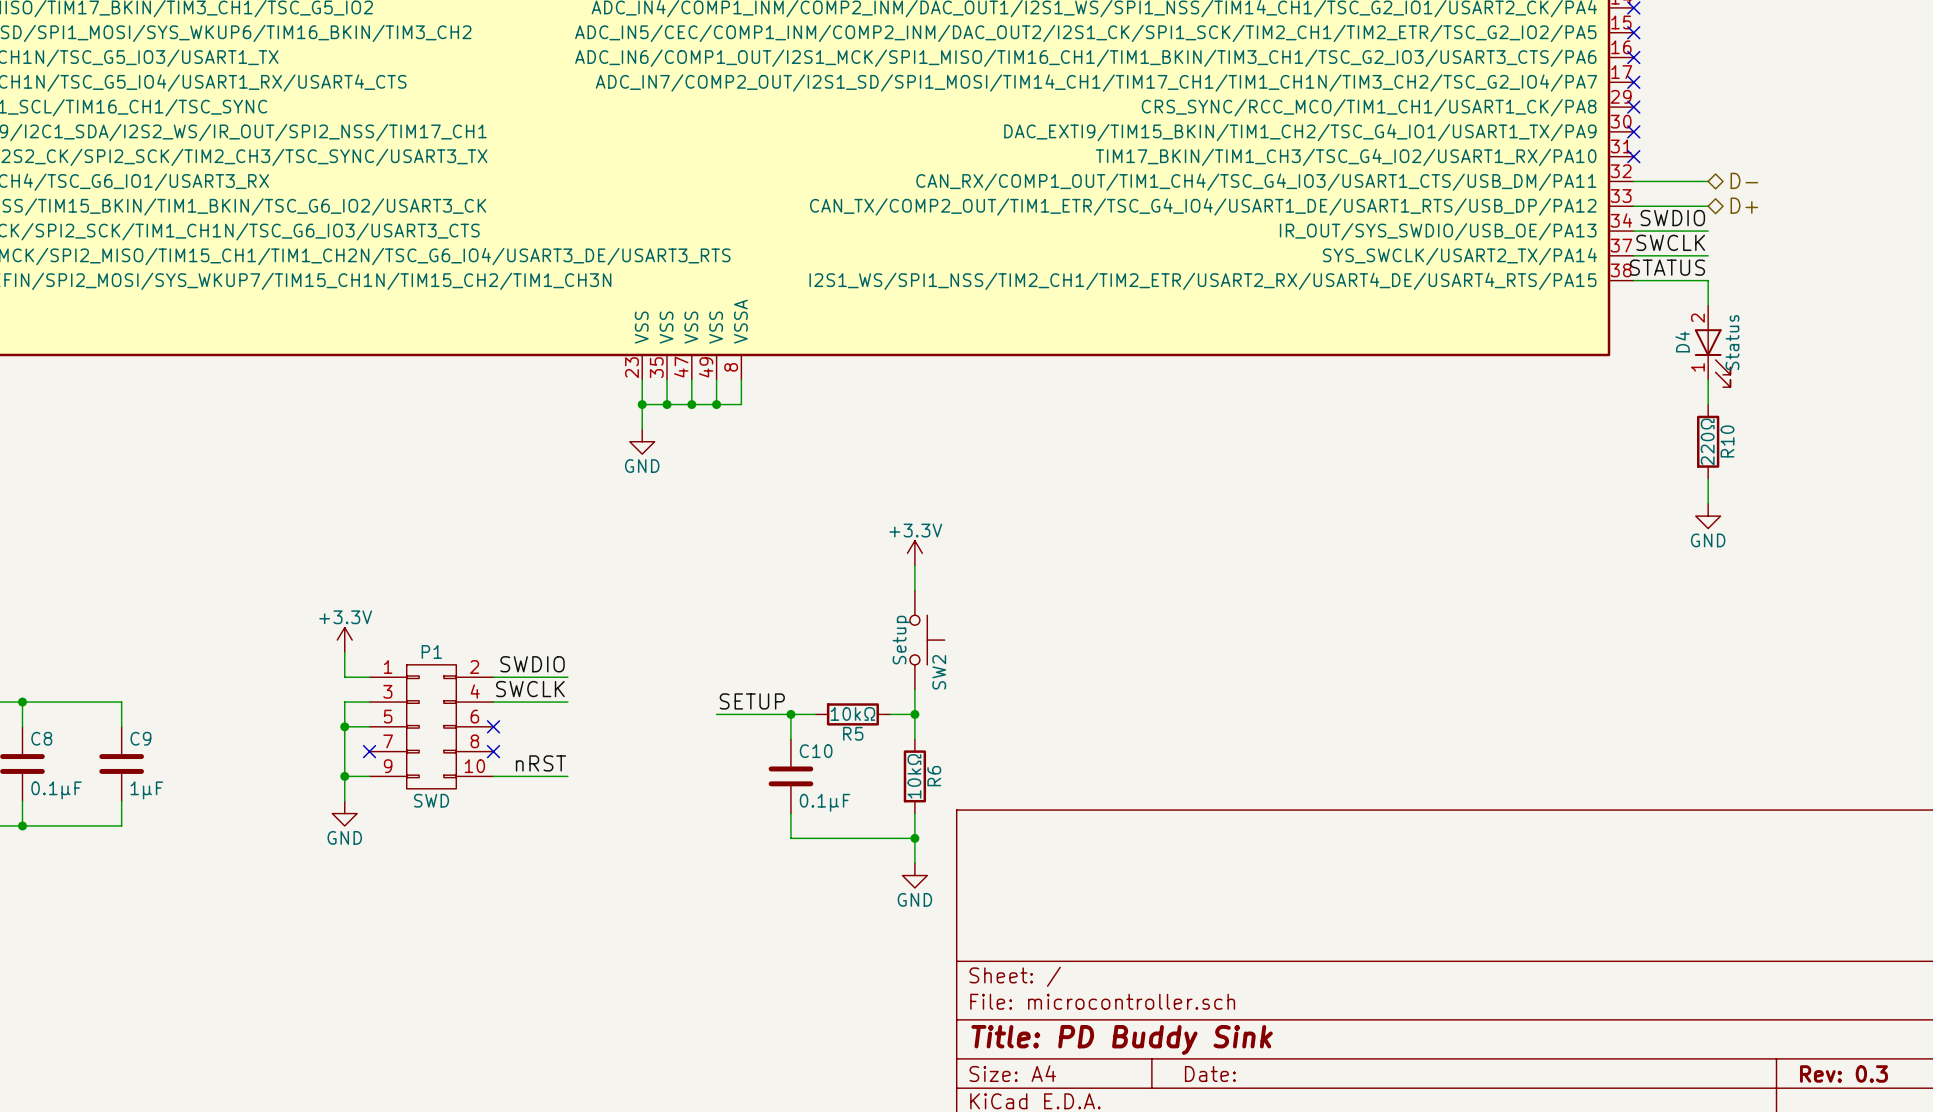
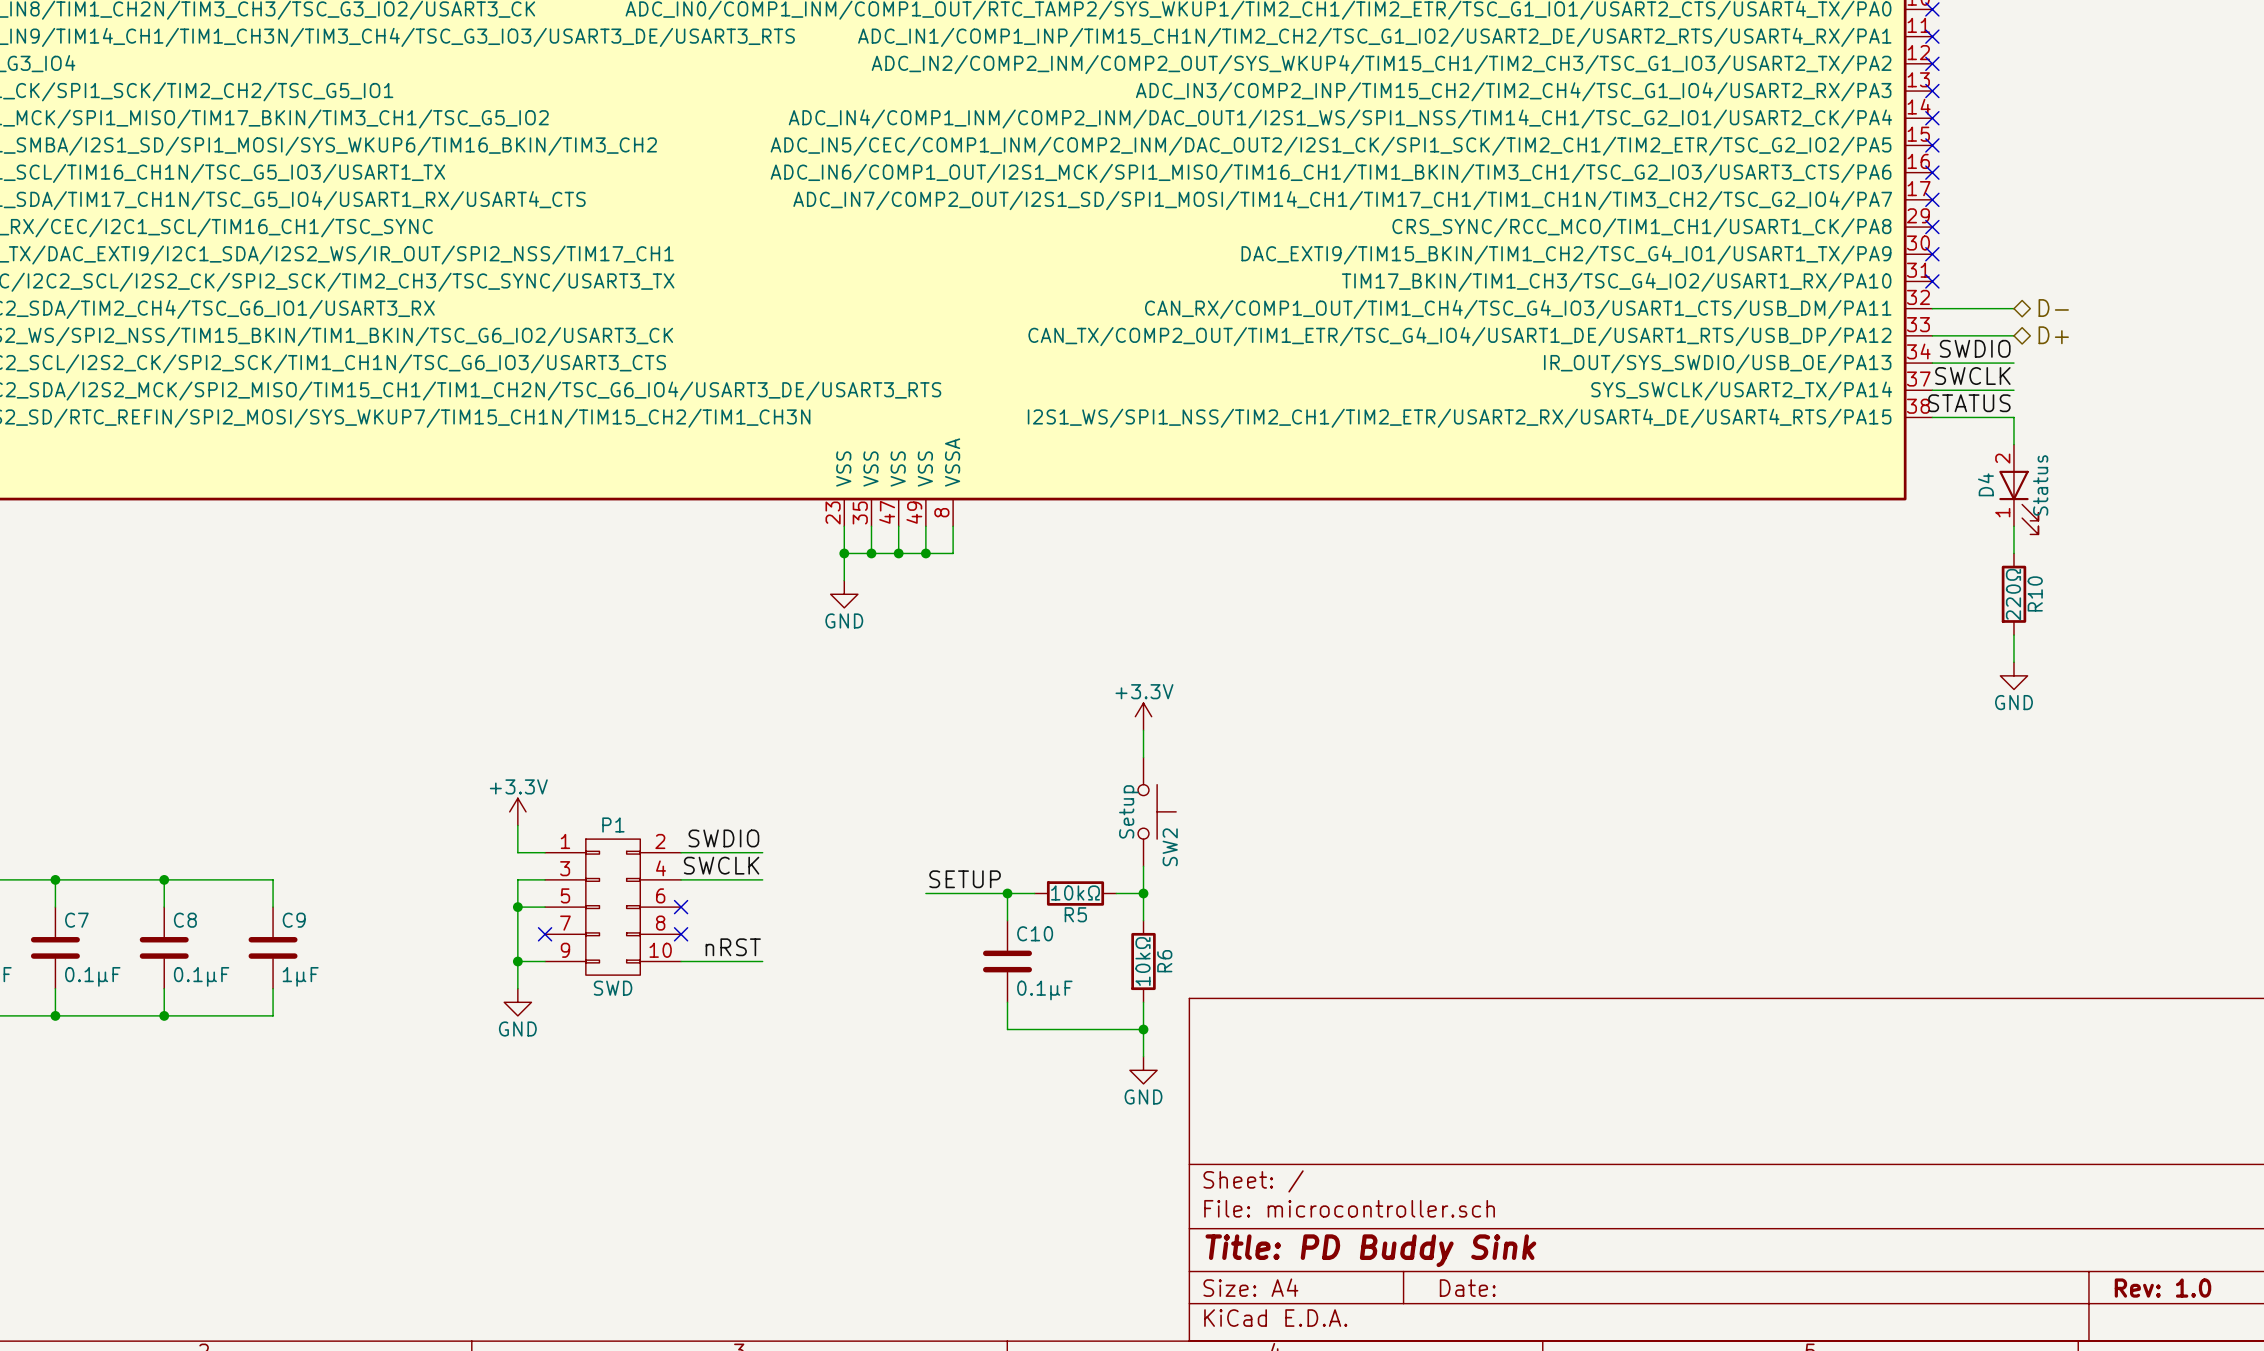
title block: Rev: 0.3 (1843, 1073) -> Rev: 1.0 (2163, 1288)

